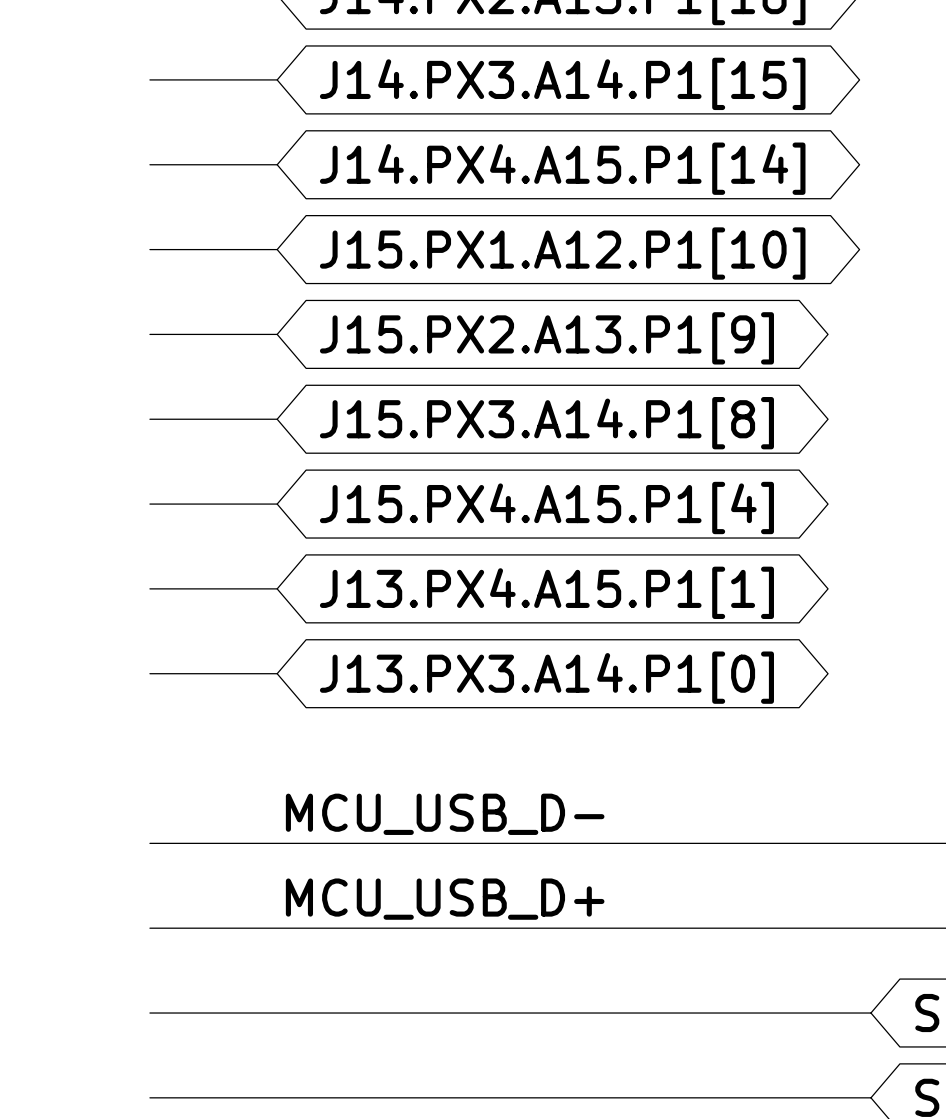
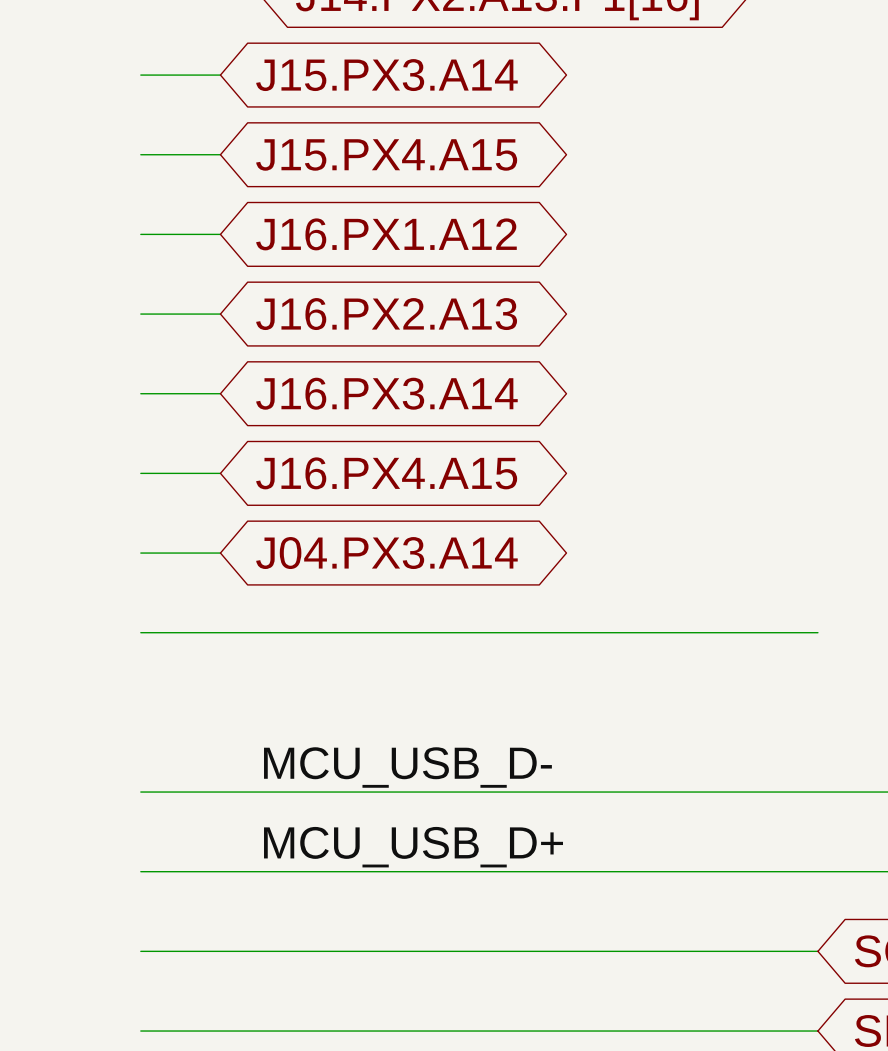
wire: (234, 79) (277, 79) -> none
global label: J14.PX3.A14.P1[15] (562, 83) -> J15.PX3.A14 (386, 75)
wire: (234, 164) (277, 164) -> none
global label: J14.PX4.A15.P1[14] (562, 168) -> J15.PX4.A15 (386, 154)
wire: (234, 249) (277, 249) -> none
global label: J15.PX1.A12.P1[10] (562, 253) -> J16.PX1.A12 (386, 234)
wire: (234, 334) (277, 334) -> none
global label: J15.PX2.A13.P1[9] (546, 338) -> J16.PX2.A13 (386, 314)
wire: (234, 419) (277, 419) -> none
global label: J15.PX3.A14.P1[8] (546, 423) -> J16.PX3.A14 (386, 393)
wire: (234, 504) (277, 504) -> none
global label: J15.PX4.A15.P1[4] (546, 508) -> J16.PX4.A15 (386, 473)
wire: (234, 588) (277, 588) -> none
global label: none -> J04.PX3.A14 (386, 553)
global label: J13.PX4.A15.P1[1] (546, 592) -> none
wire: none -> (260, 632) (817, 632)
global label: J13.PX3.A14.P1[0] (546, 677) -> none

